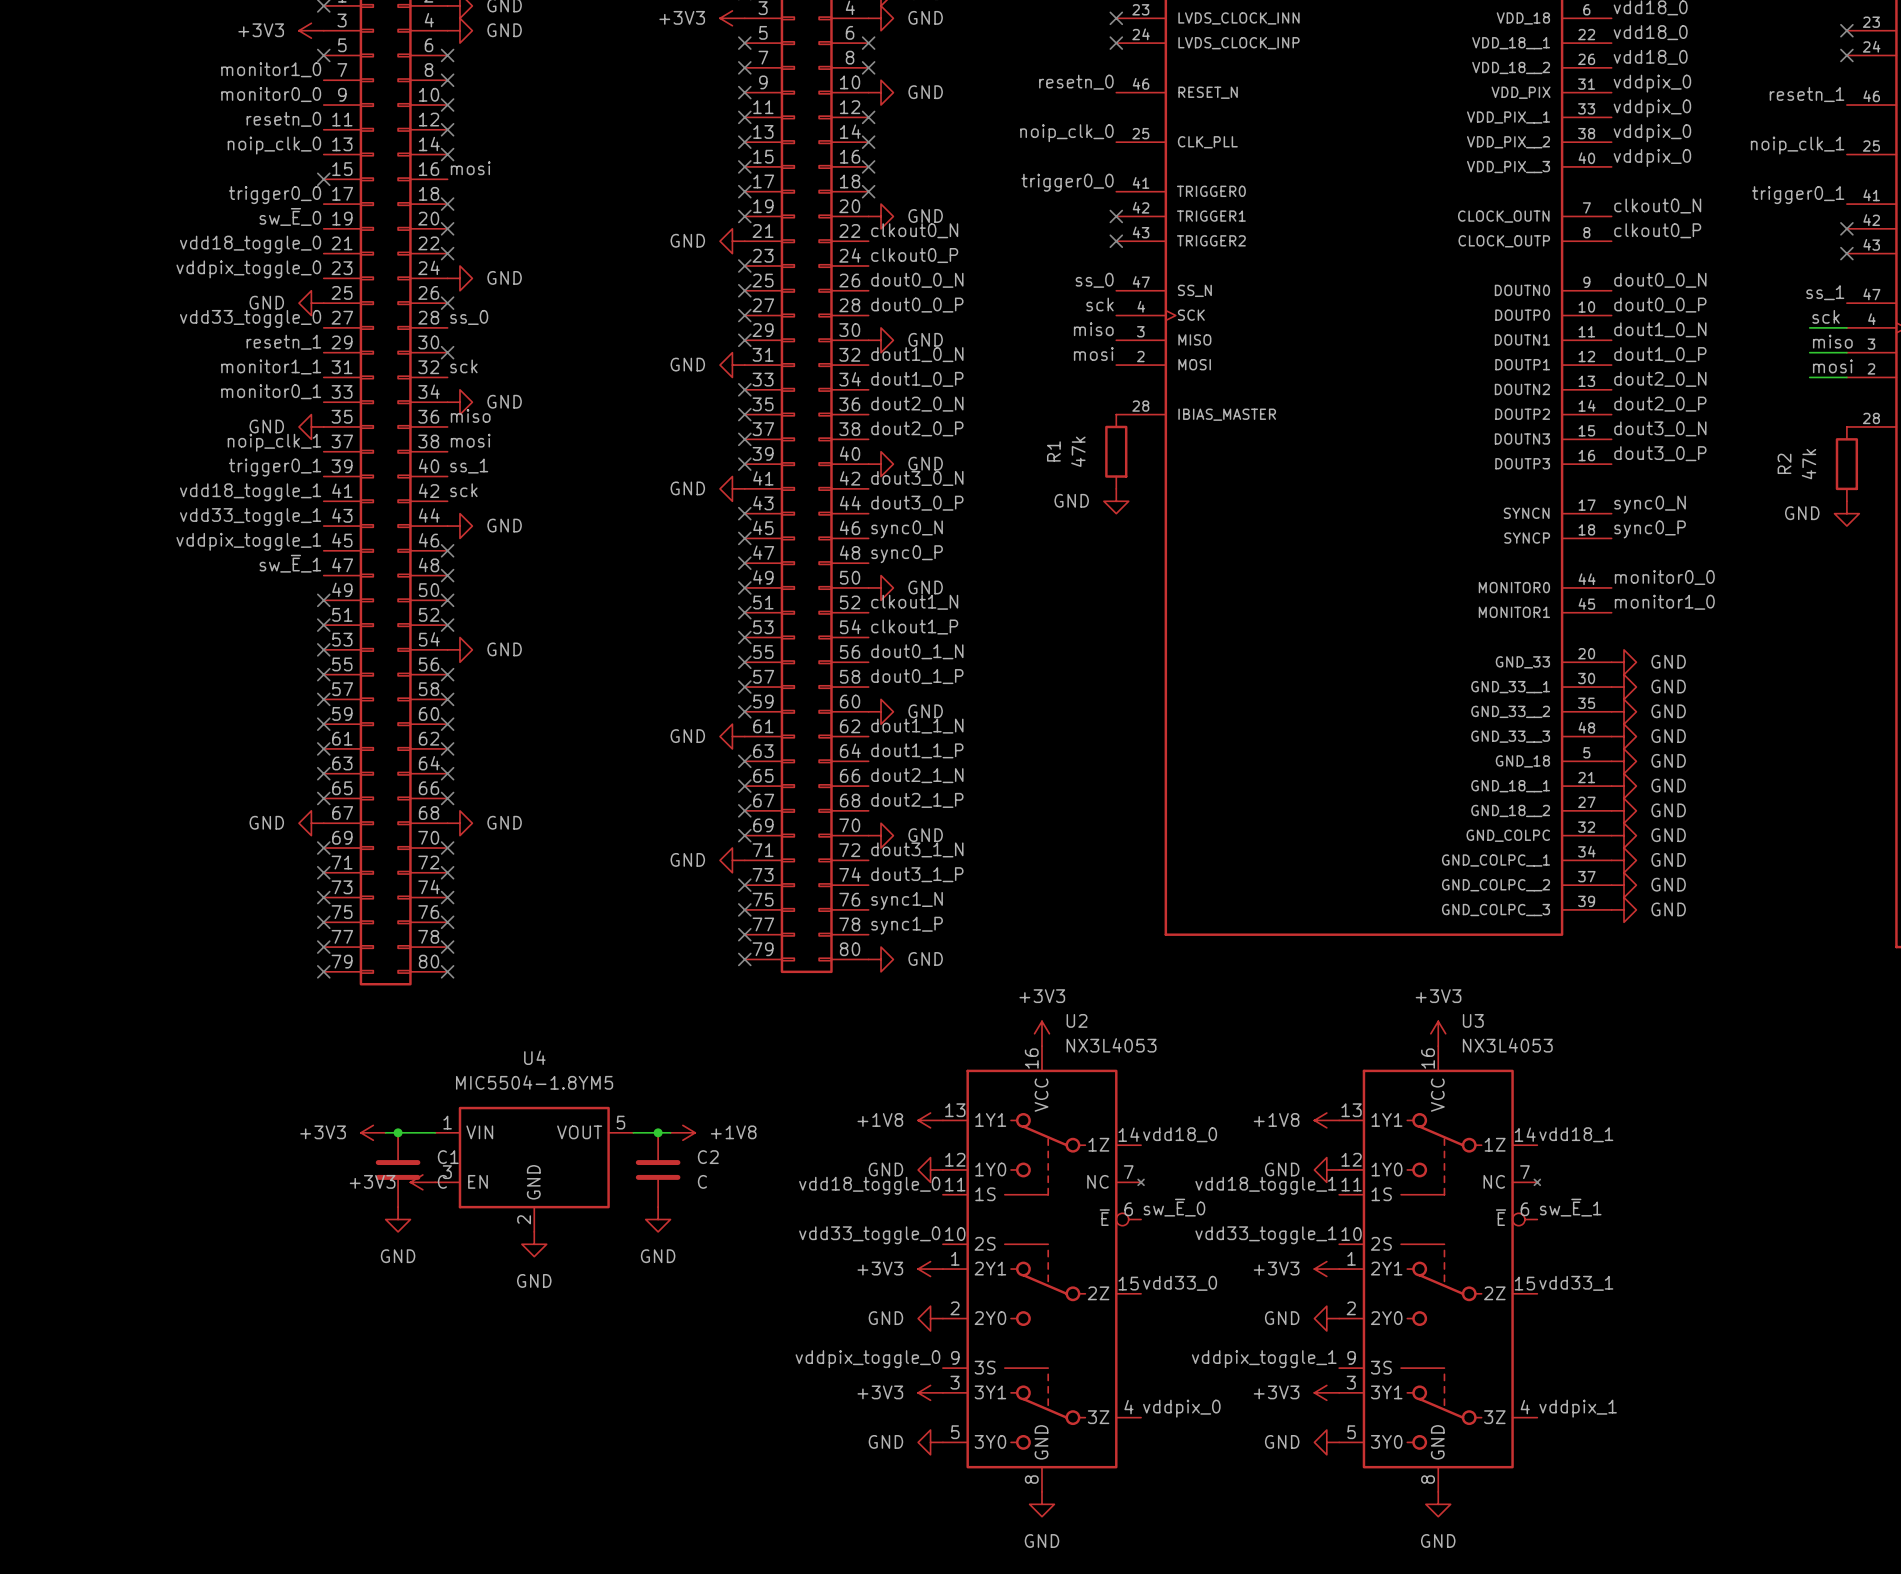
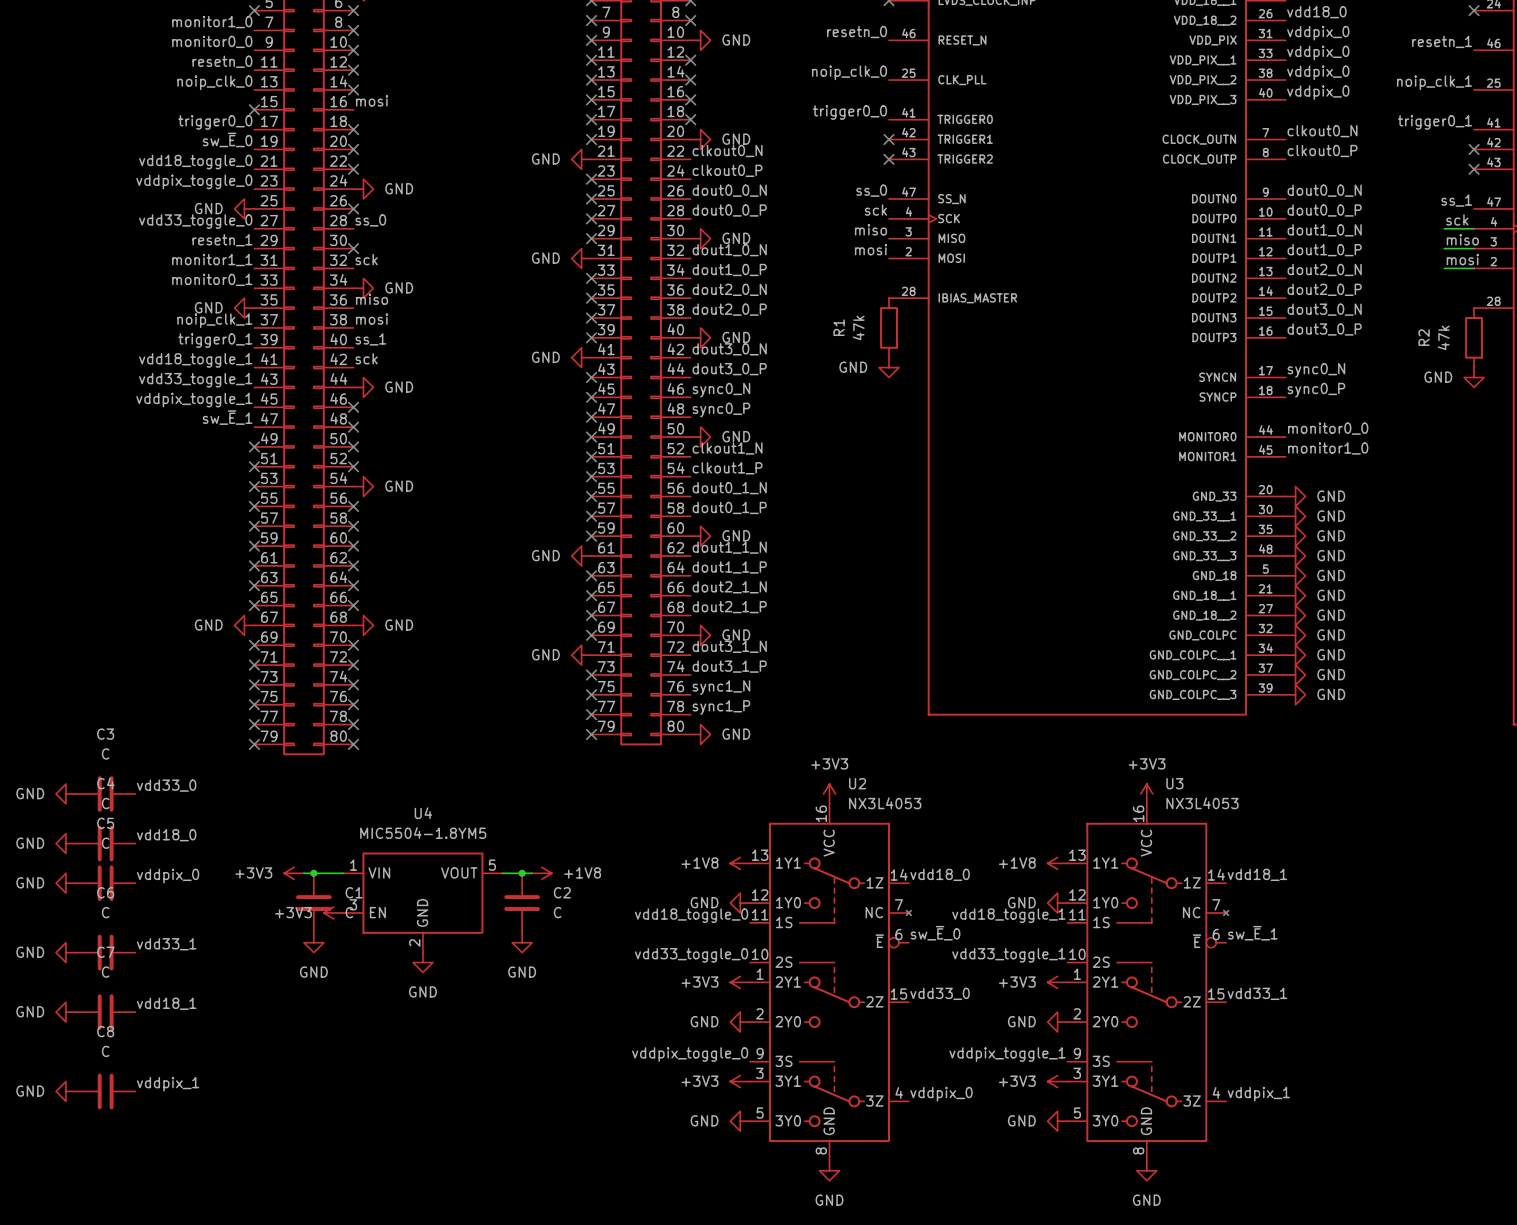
label: none -> vdd33_0 (166, 785)
power symbol: none -> GND (65, 793)
C3: none -> C (105, 793)
label: none -> vdd18_0 (166, 835)
power symbol: none -> GND (65, 843)
C4: none -> C (105, 843)
label: none -> vddpix_0 (168, 876)
power symbol: none -> GND (65, 883)
C5: none -> C (105, 883)
label: none -> vdd33_1 (166, 944)
power symbol: none -> GND (65, 952)
C6: none -> C (105, 952)
label: none -> vdd18_1 (166, 1003)
power symbol: none -> GND (65, 1012)
C7: none -> C (105, 1012)
label: none -> vddpix_1 (168, 1084)
power symbol: none -> GND (65, 1091)
C8: none -> C (105, 1091)

